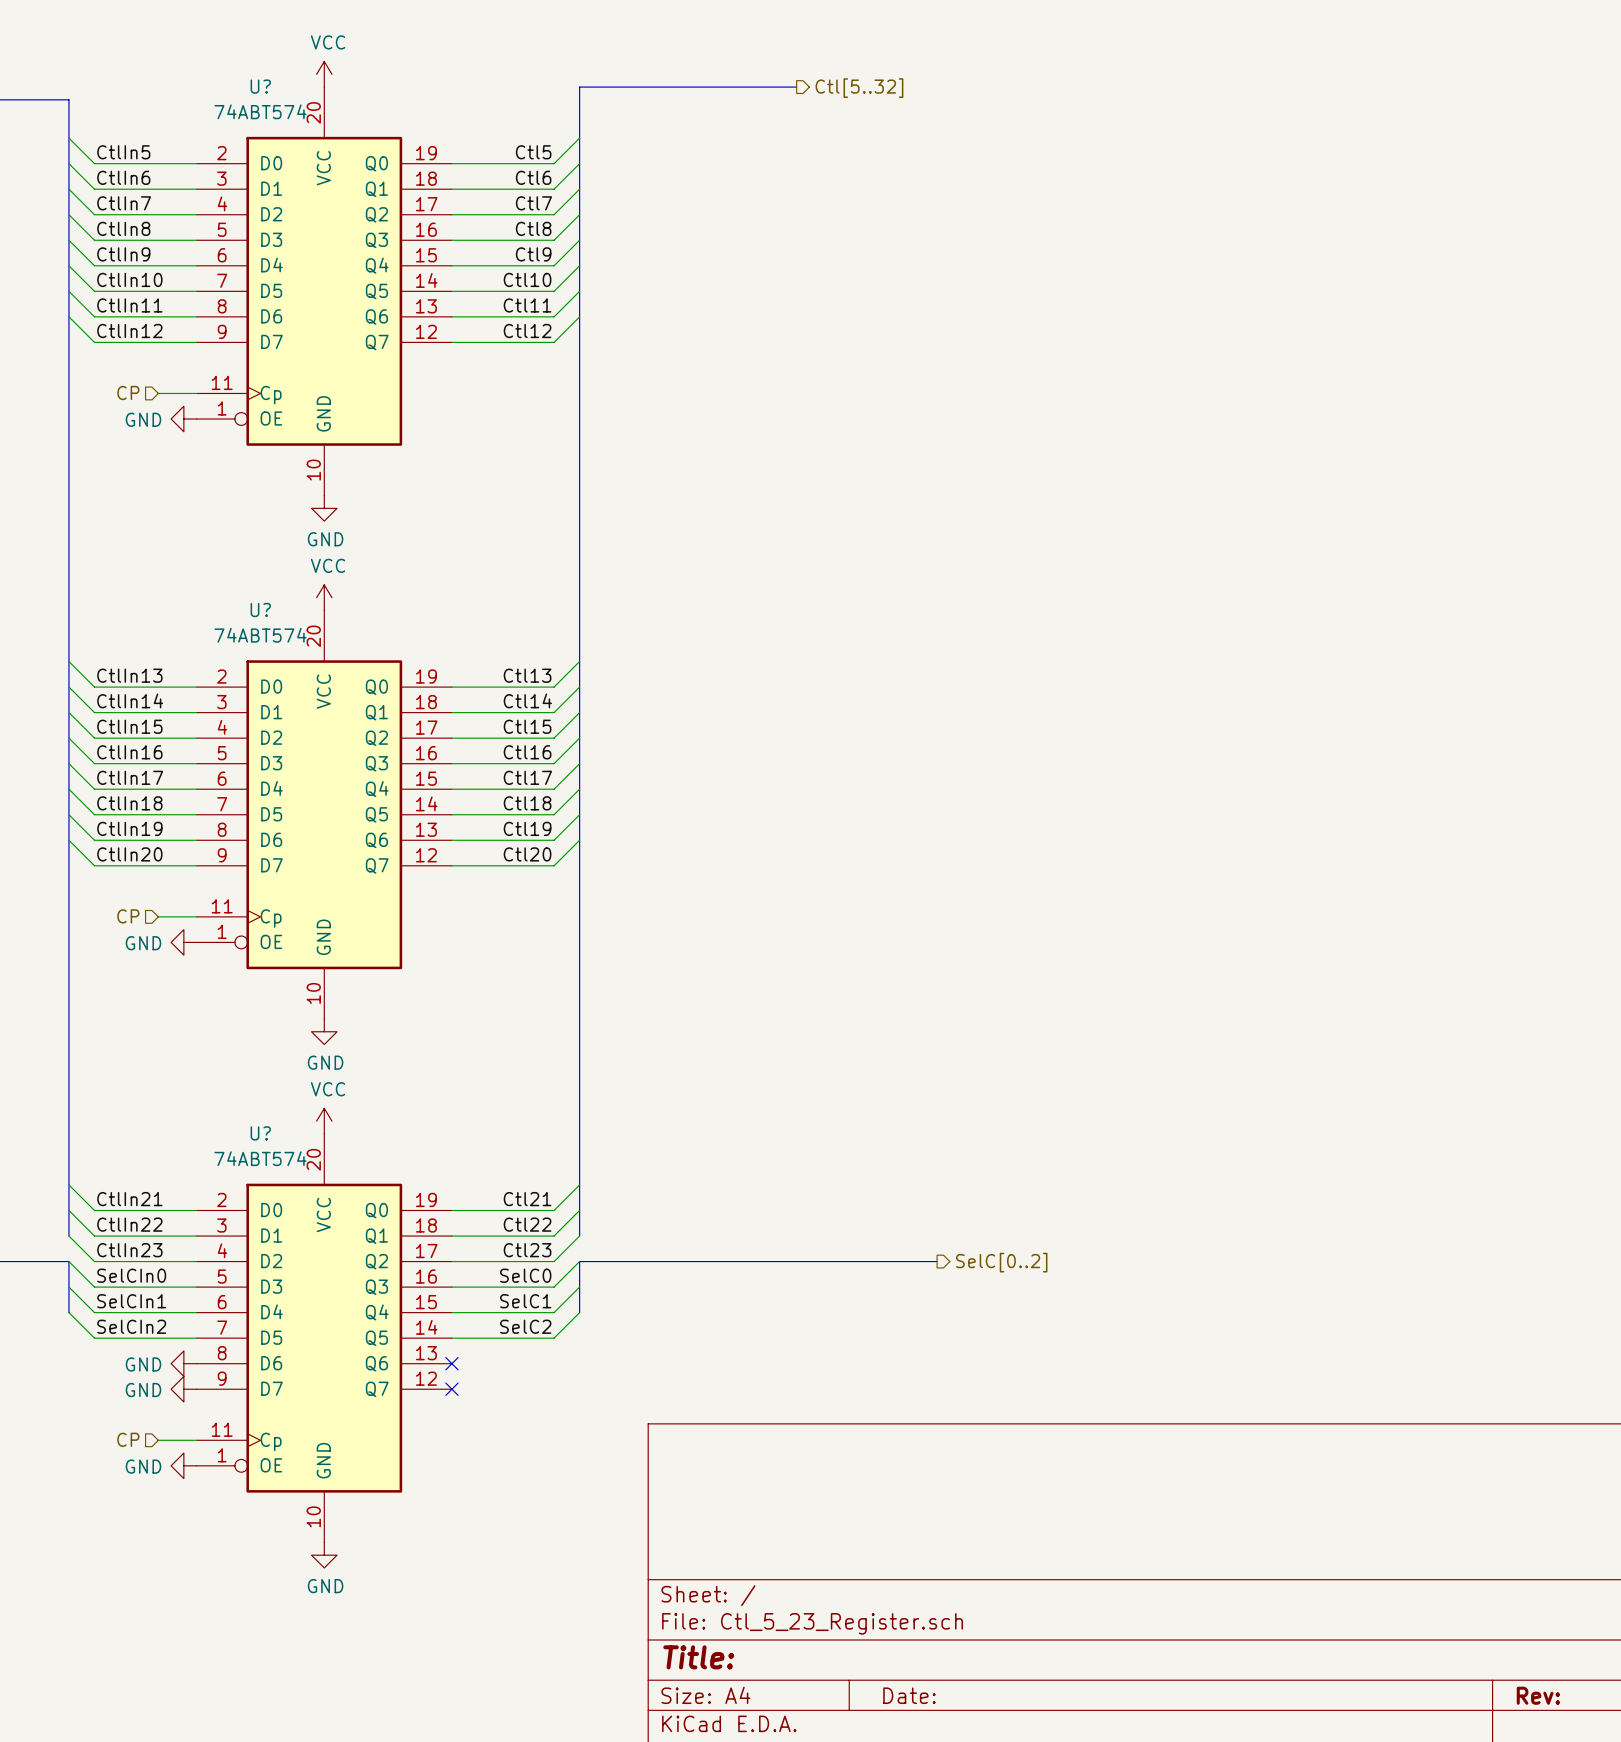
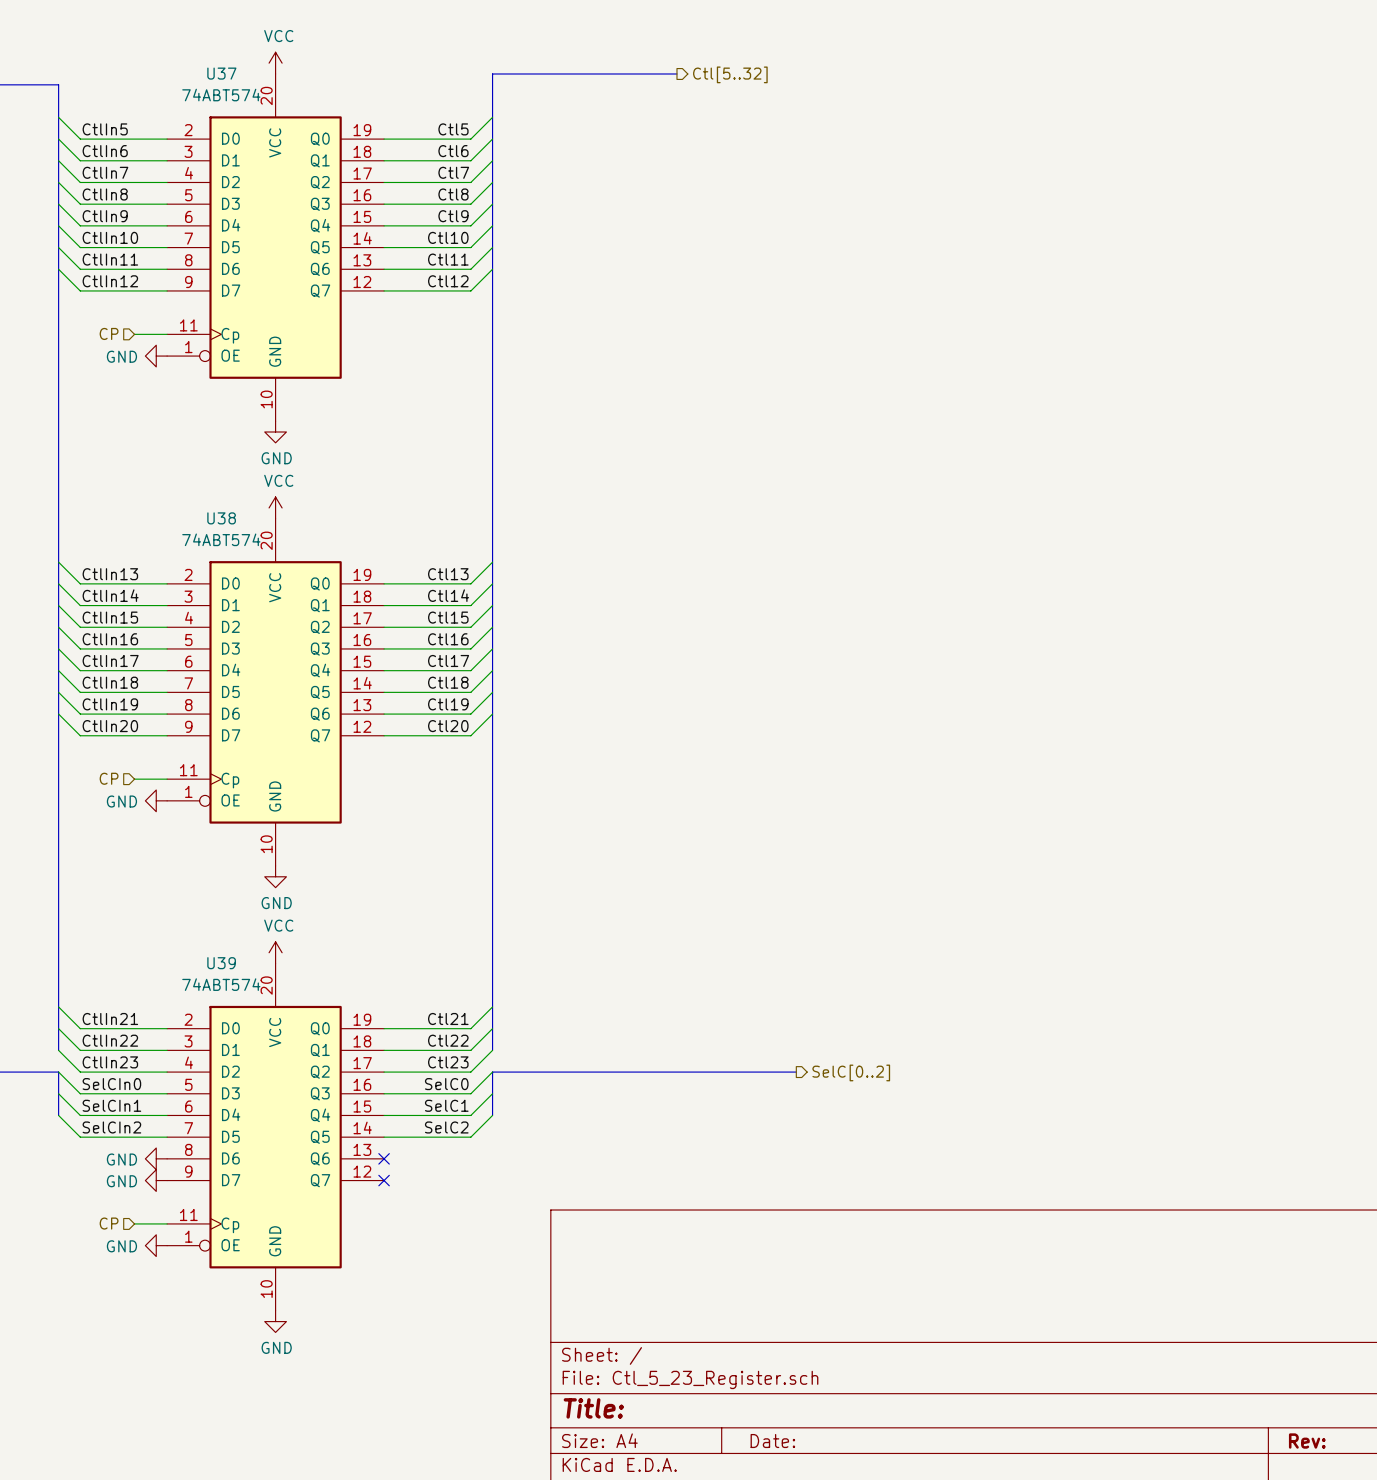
U? name: U? (260, 86) -> U37 (221, 73)
U? name: U? (260, 610) -> U38 (221, 518)
U? name: U? (260, 1133) -> U39 (221, 963)

